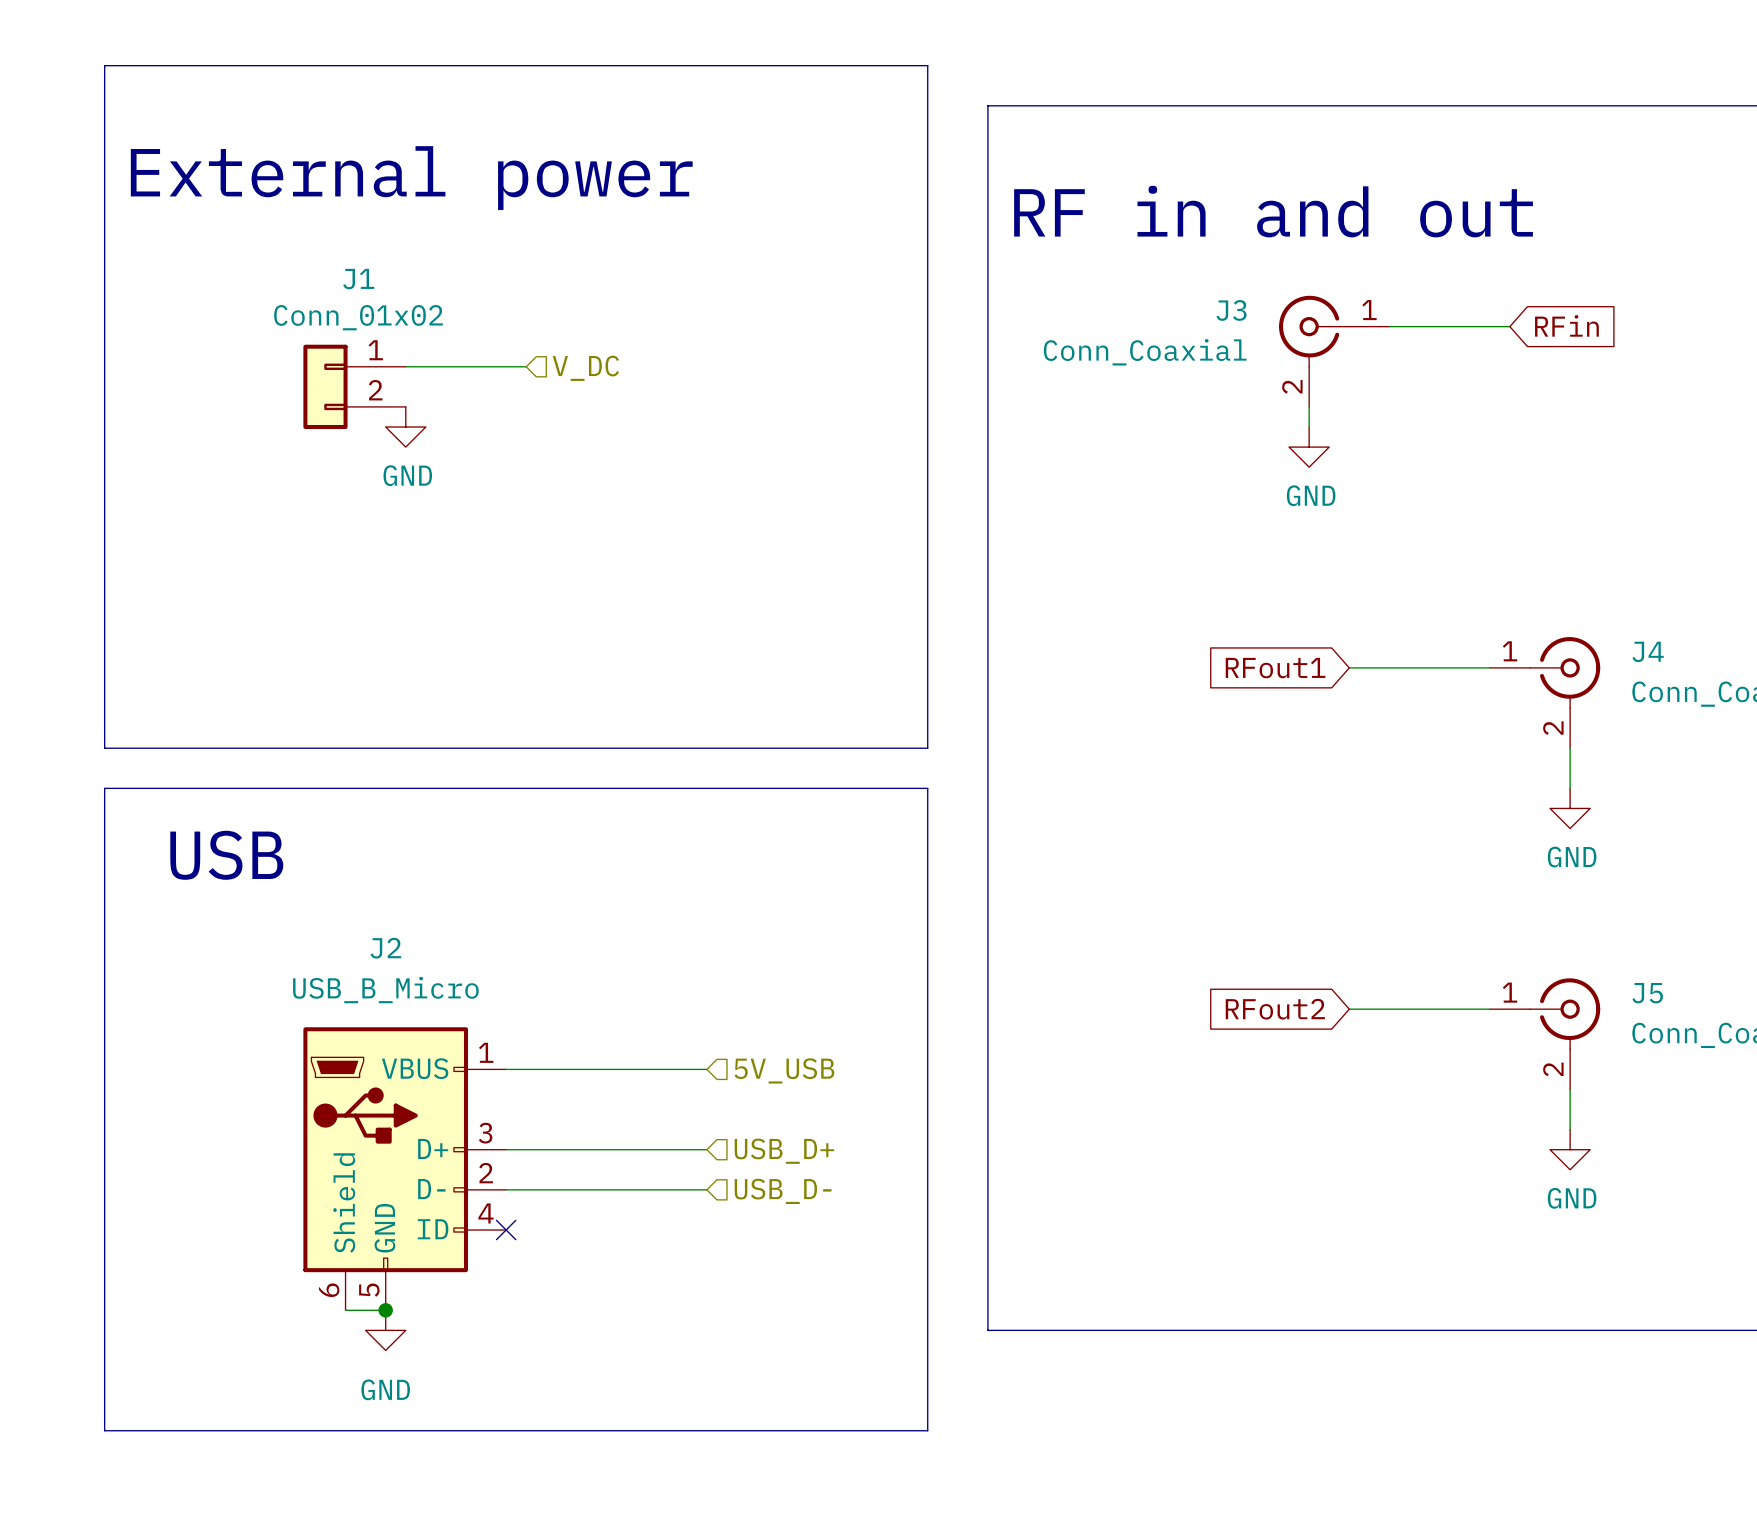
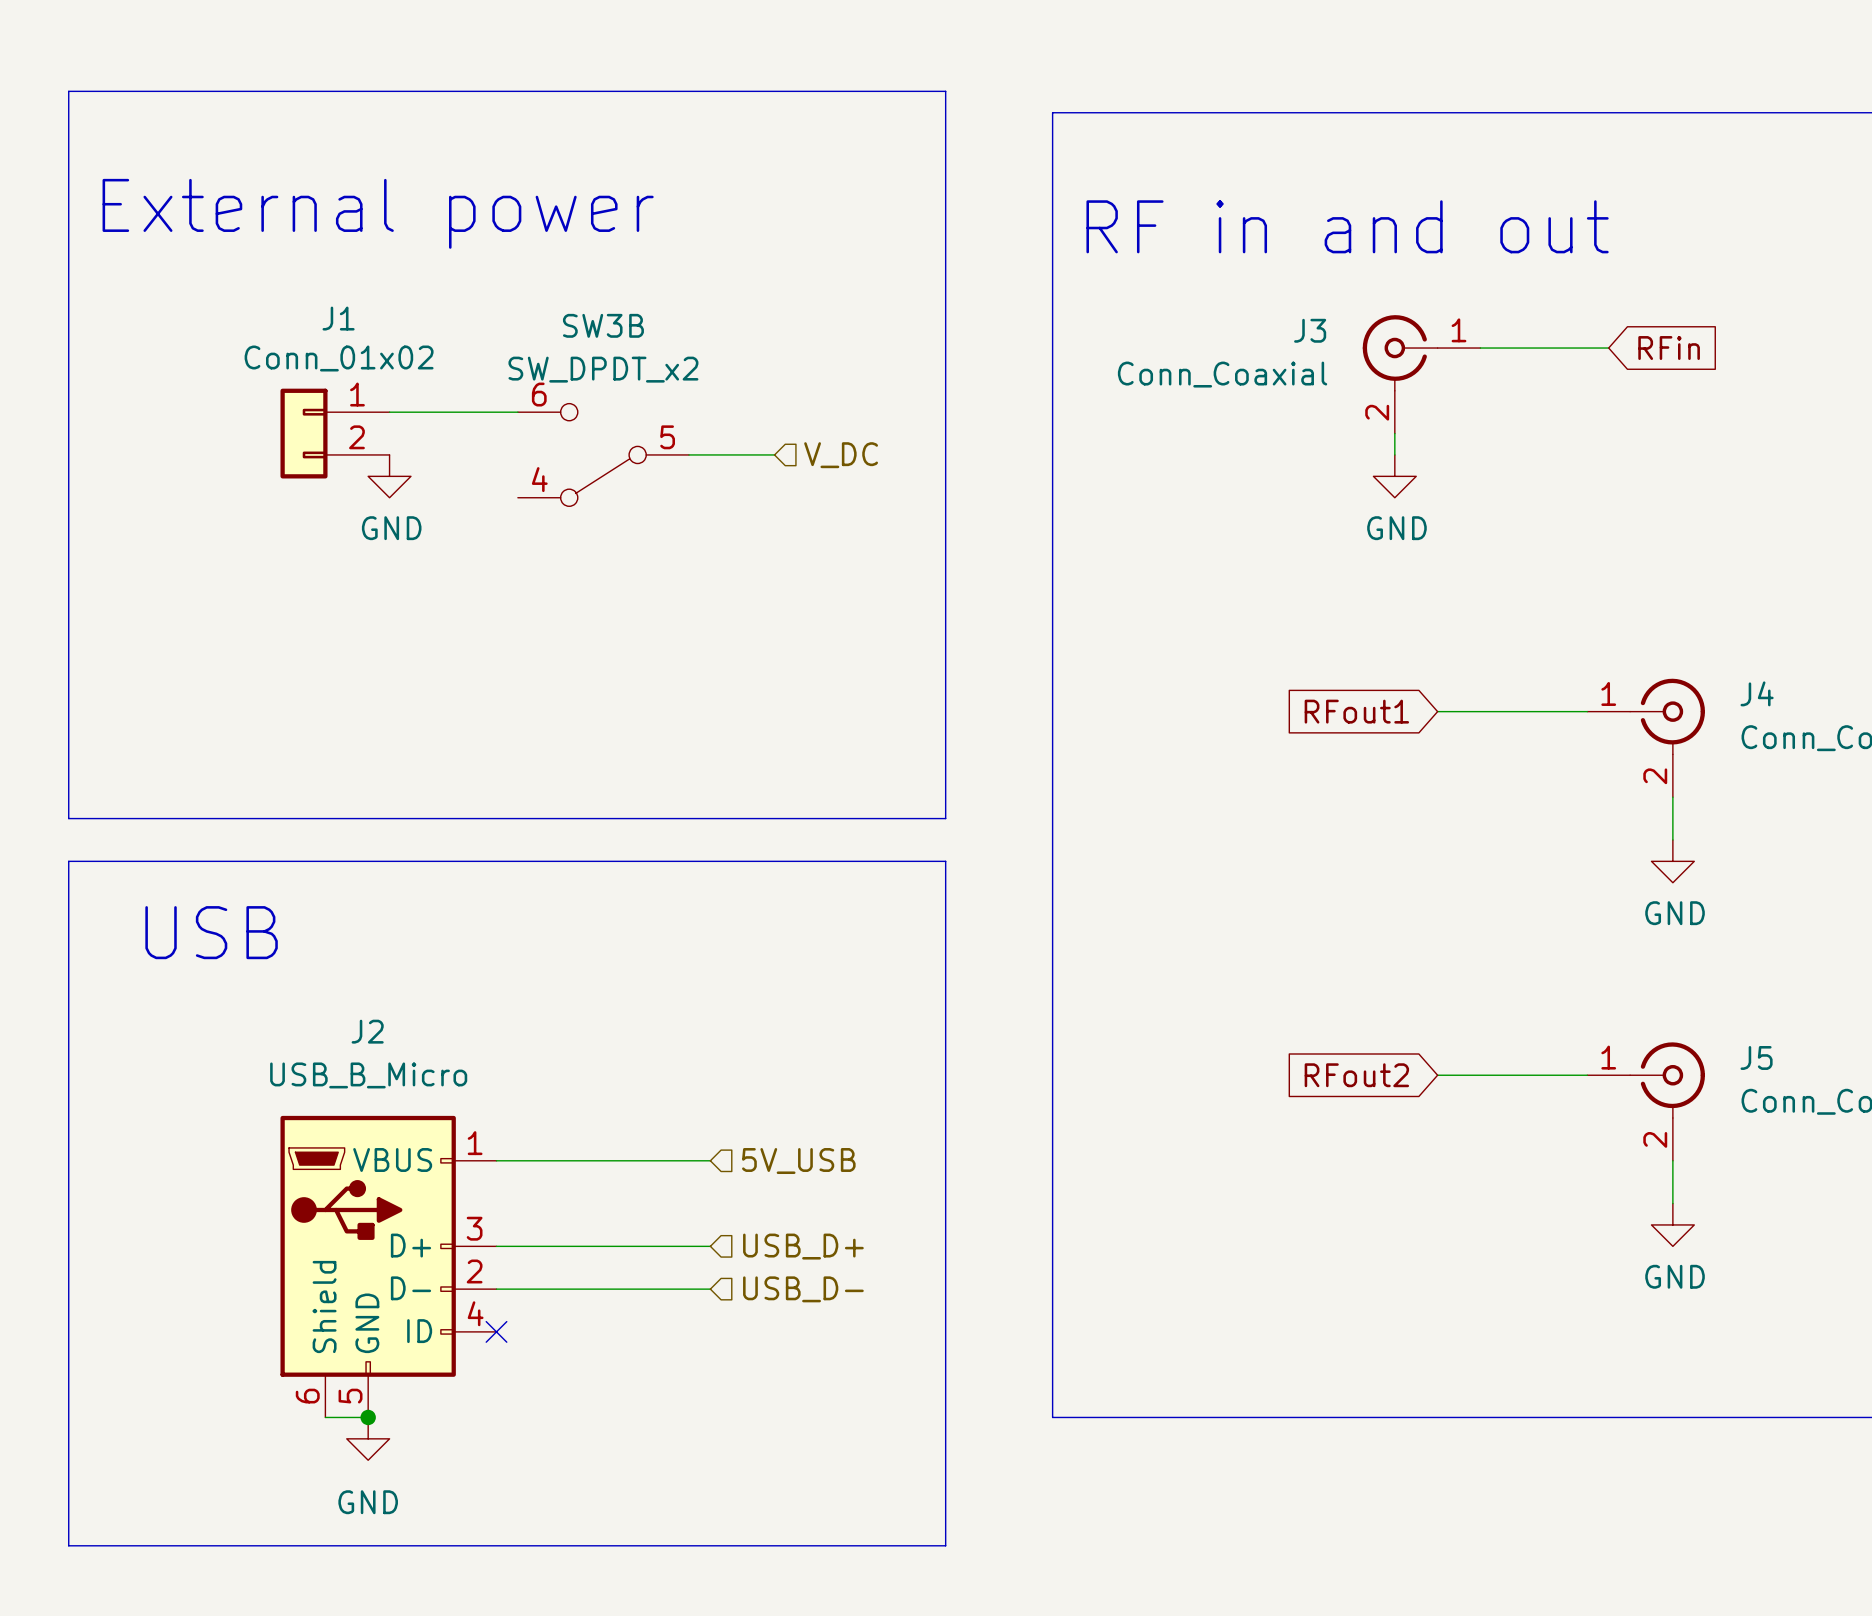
line: (104, 65) (927, 65) (927, 748) (104, 748) (104, 65) -> (68, 91) (945, 91) (945, 818) (68, 818) (68, 91)
text position: External power (411, 178) -> External power (378, 213)
wire: (405, 366) (526, 366) -> (389, 412) (517, 412)
hierarchical label position: V_DC (585, 368) -> V_DC (841, 455)
J1 position: (354, 386) -> (335, 433)
power symbol position: GND (405, 427) -> GND (389, 476)
SW3B: none -> SW_DPDT_x2 (603, 454)
wire: none -> (689, 454) (774, 454)
line: (104, 788) (104, 1430) (927, 1430) (927, 788) (104, 788) -> (68, 861) (68, 1545) (945, 1545) (945, 861) (68, 861)
text position: USB (226, 855) -> USB (211, 932)
wire: (506, 1069) (706, 1069) -> (496, 1160) (710, 1160)
hierarchical label position: 5V_USB (784, 1070) -> 5V_USB (798, 1161)
wire: (506, 1149) (706, 1149) -> (496, 1246) (710, 1246)
hierarchical label position: USB_D+ (784, 1151) -> USB_D+ (803, 1246)
J2 position: (404, 1168) -> (388, 1266)
wire: (506, 1189) (706, 1189) -> (496, 1289) (710, 1289)
hierarchical label position: USB_D- (783, 1191) -> USB_D- (803, 1289)
no-connect mark position: (506, 1230) -> (496, 1331)
wire: (345, 1310) (385, 1310) -> (325, 1417) (368, 1417)
junction position: (385, 1310) -> (368, 1417)
power symbol position: GND (385, 1330) -> GND (368, 1438)

